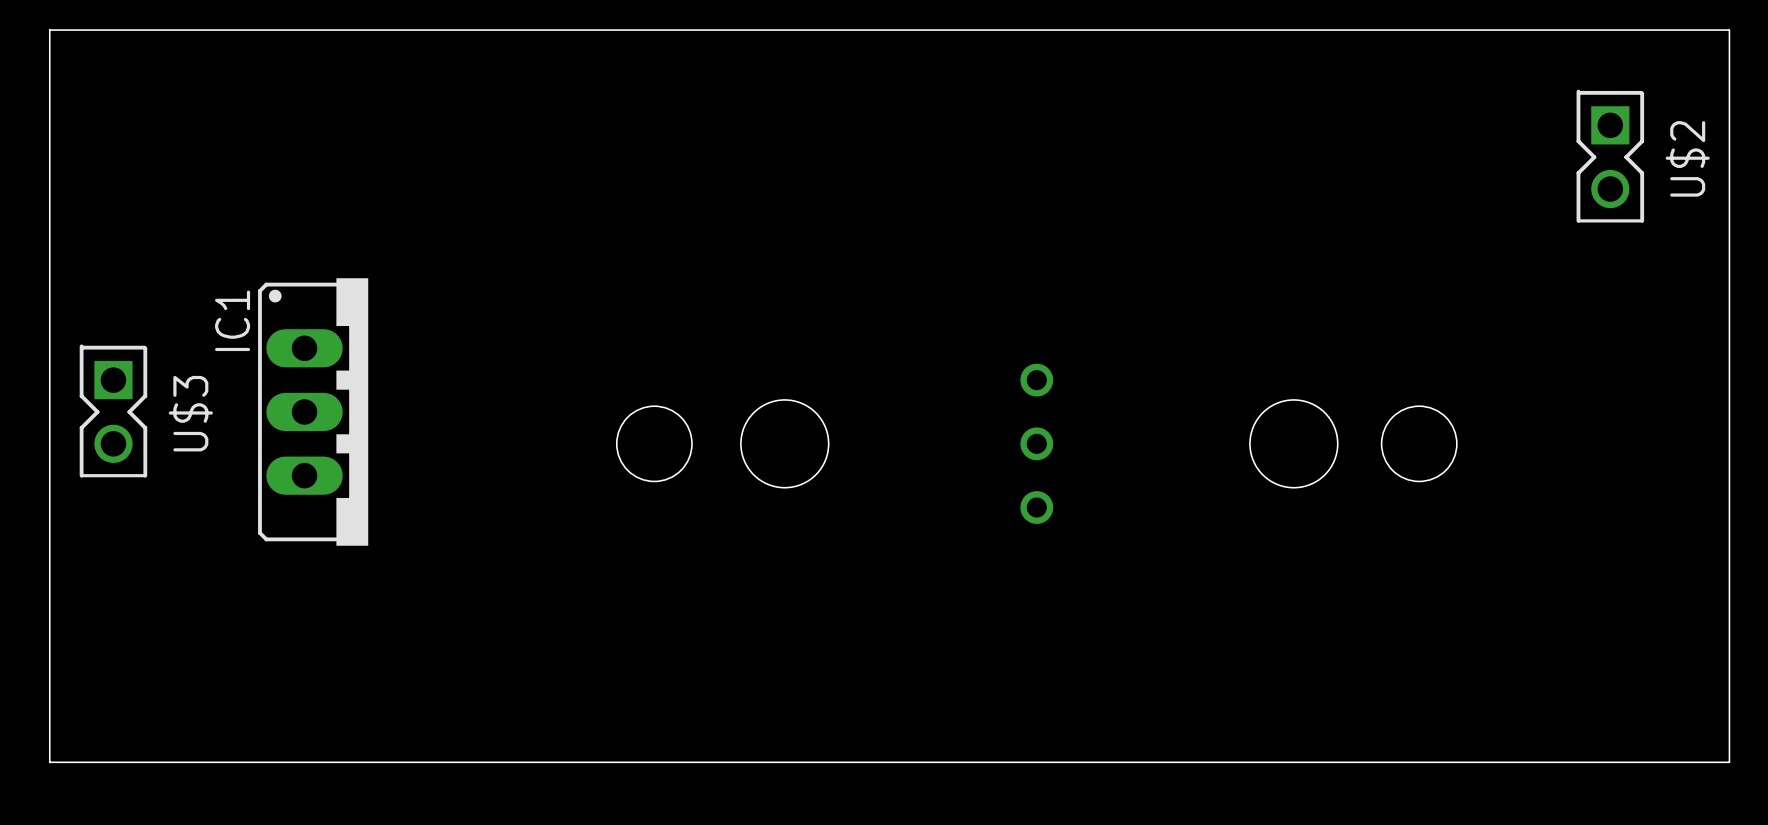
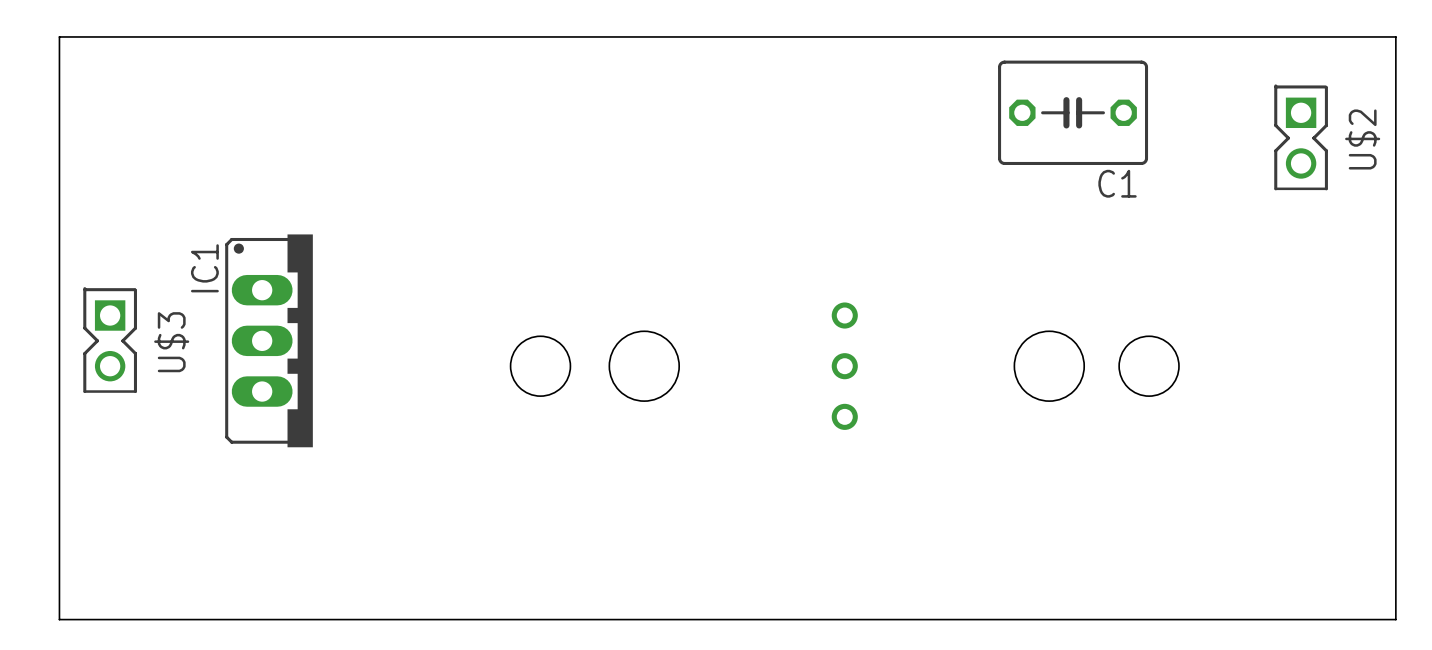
C1: none -> (1073, 112)

